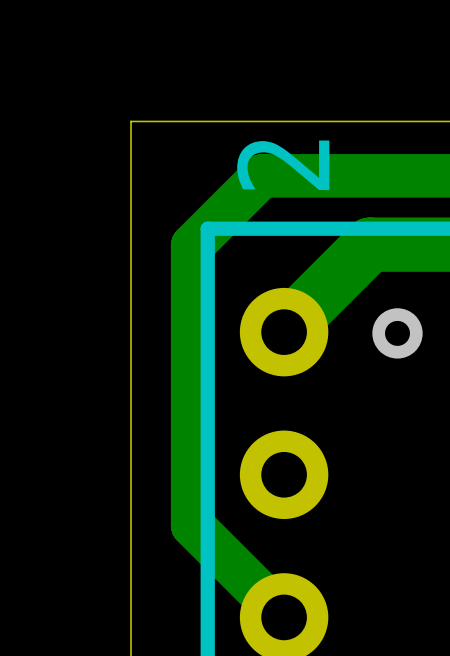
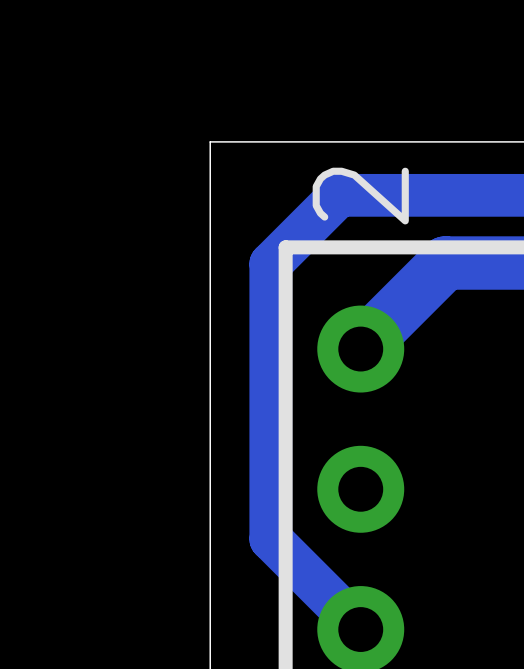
via: (397, 333) -> none

